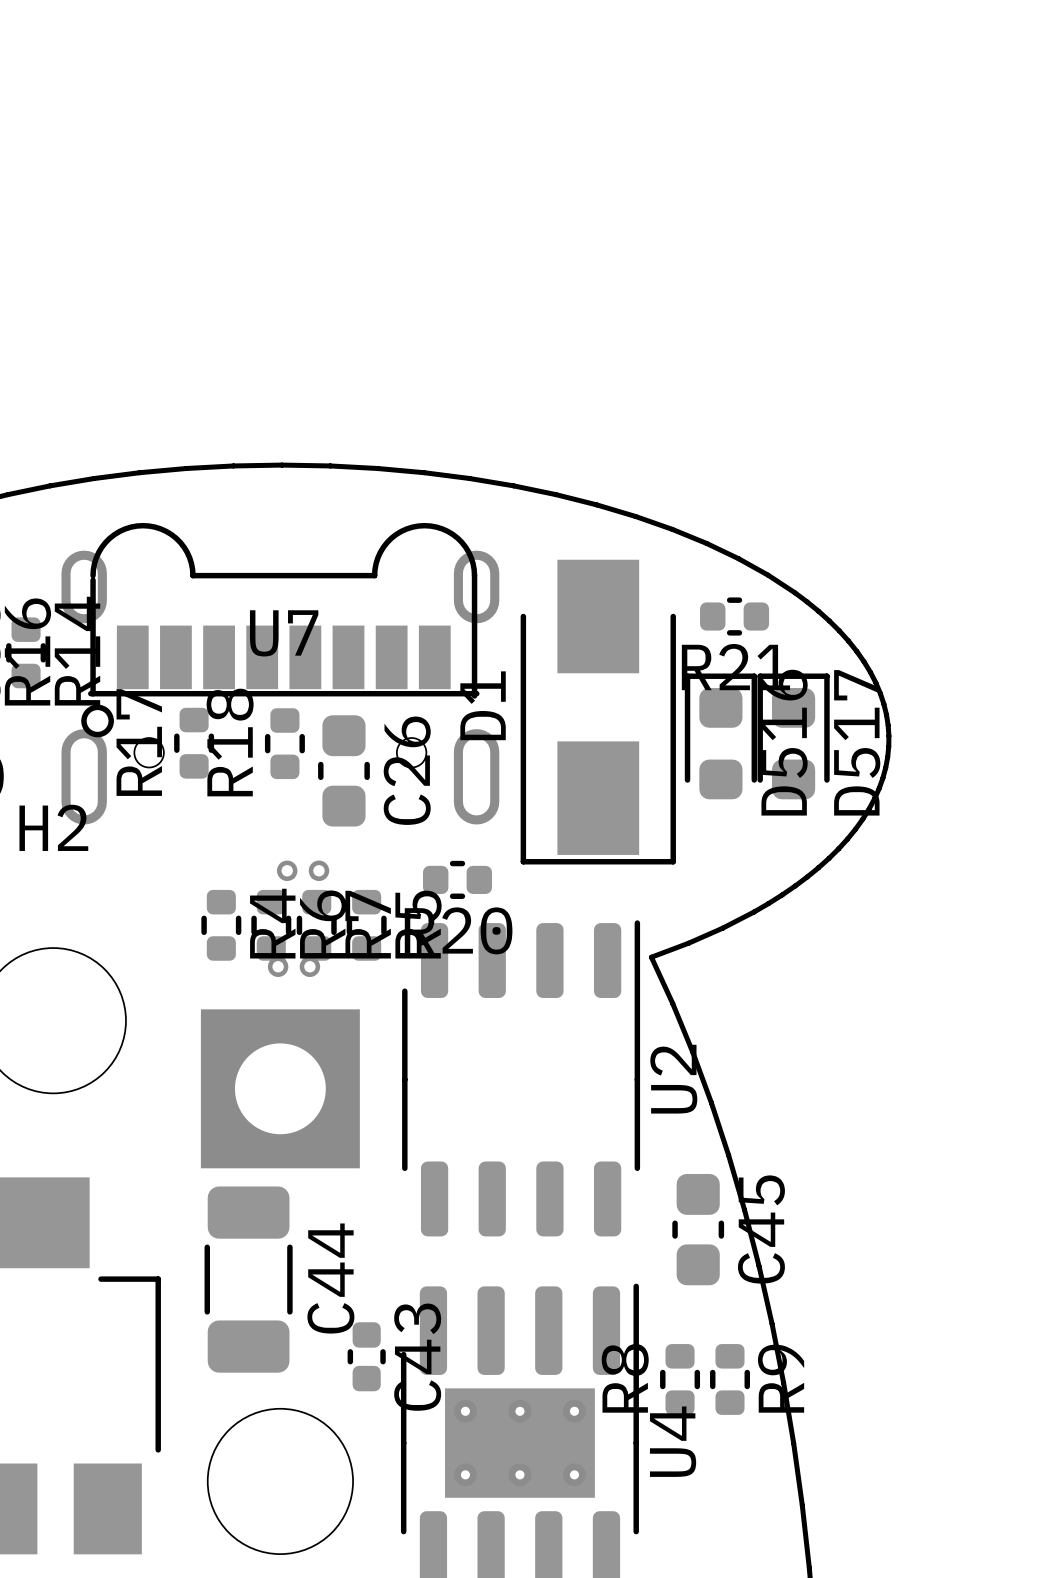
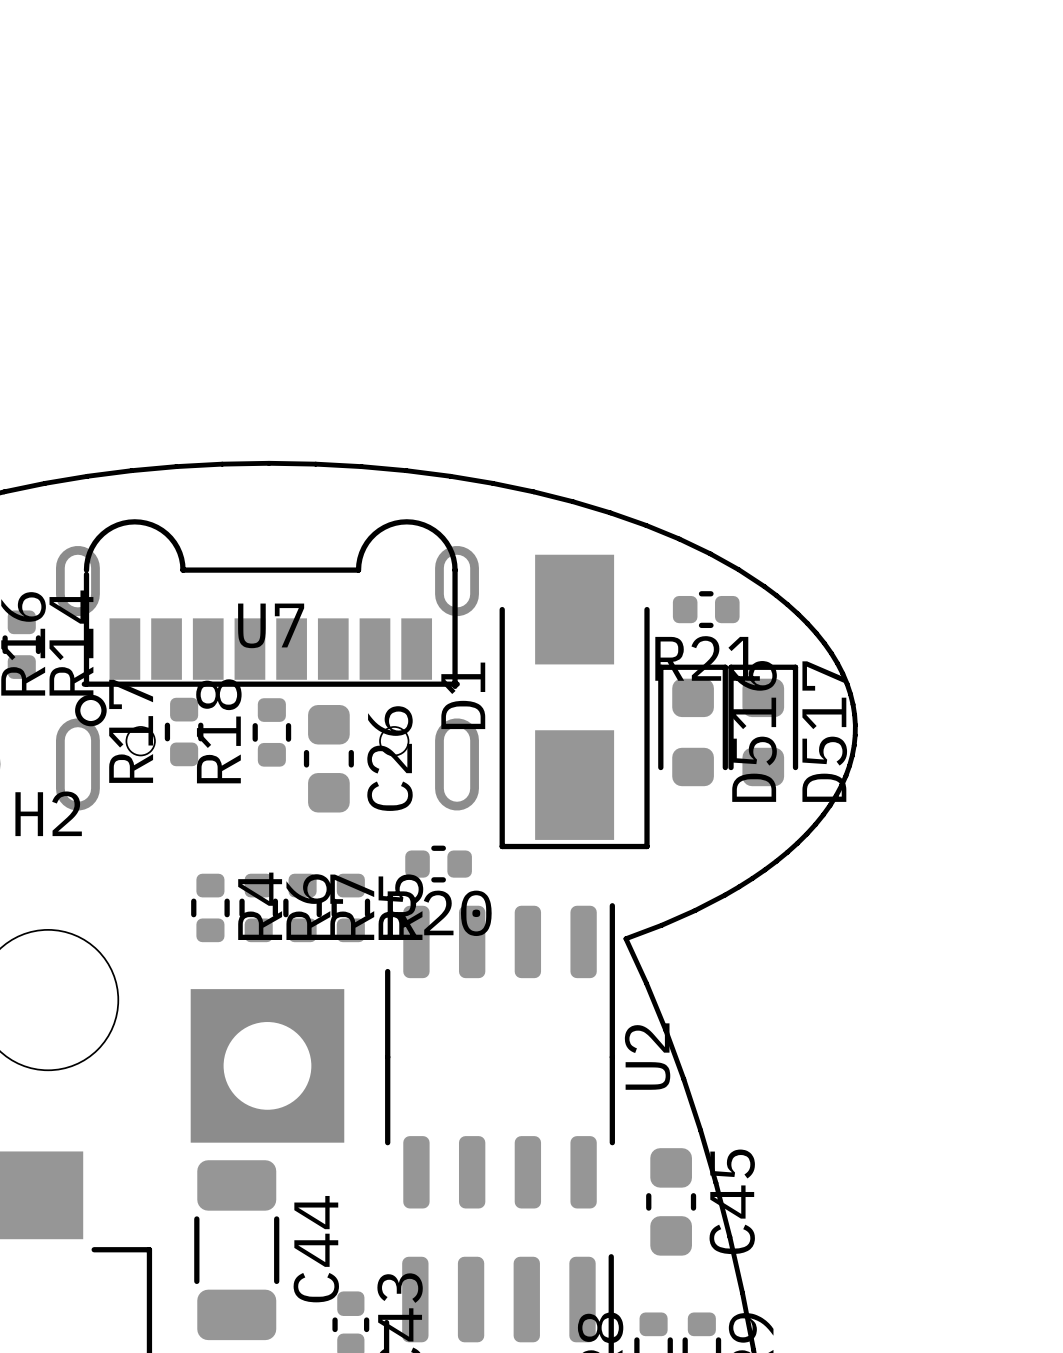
via: (287, 870) -> none
via: (318, 870) -> none
via: (278, 966) -> none
via: (309, 966) -> none

